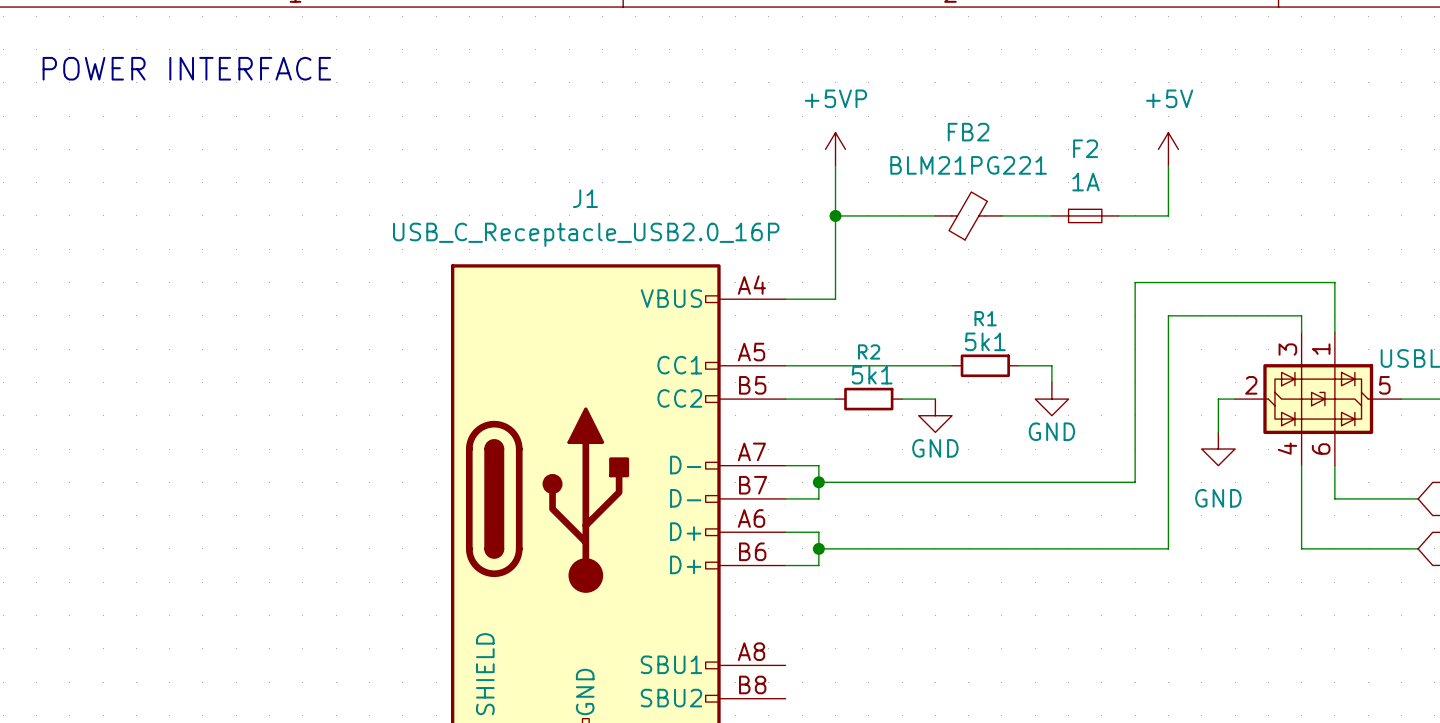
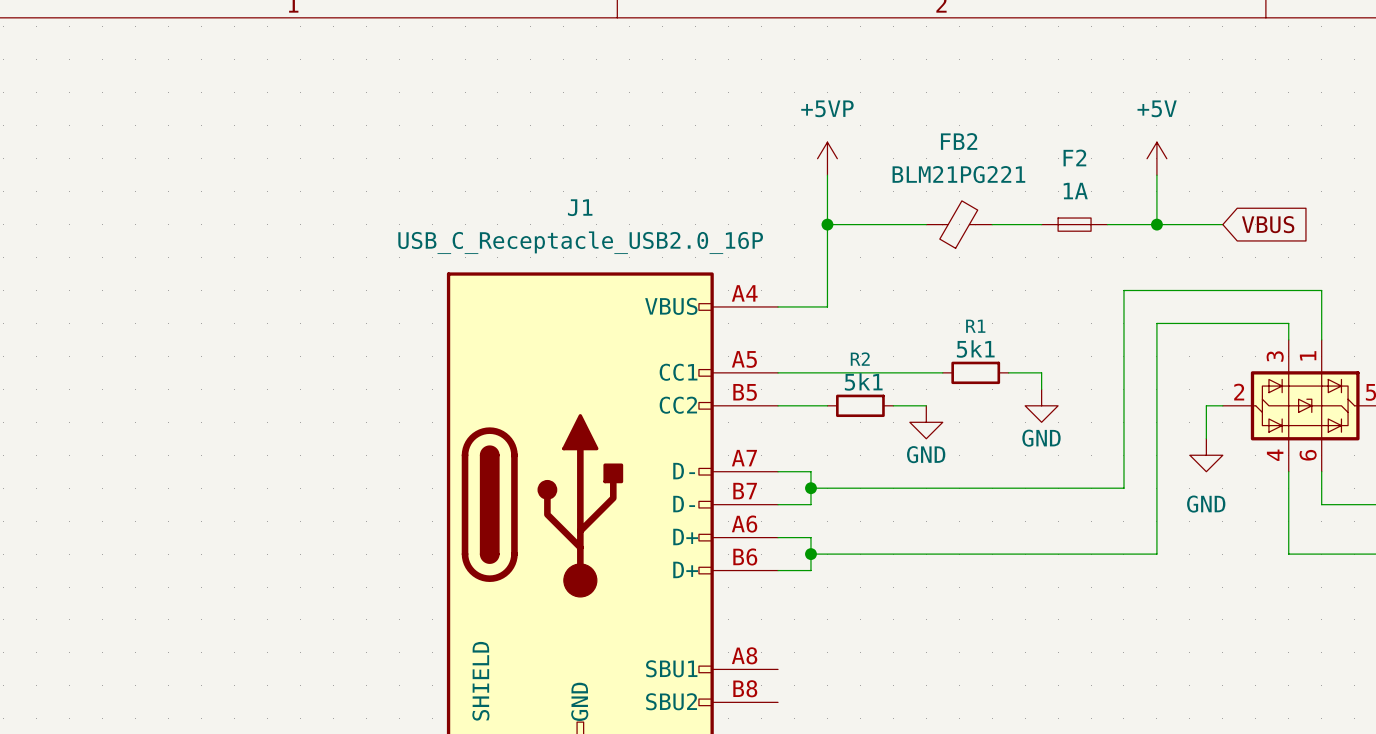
text: POWER INTERFACE (186, 68) -> none
wire: none -> (1156, 224) (1222, 224)
junction: none -> (1156, 224)
global label: none -> VBUS (1268, 224)

